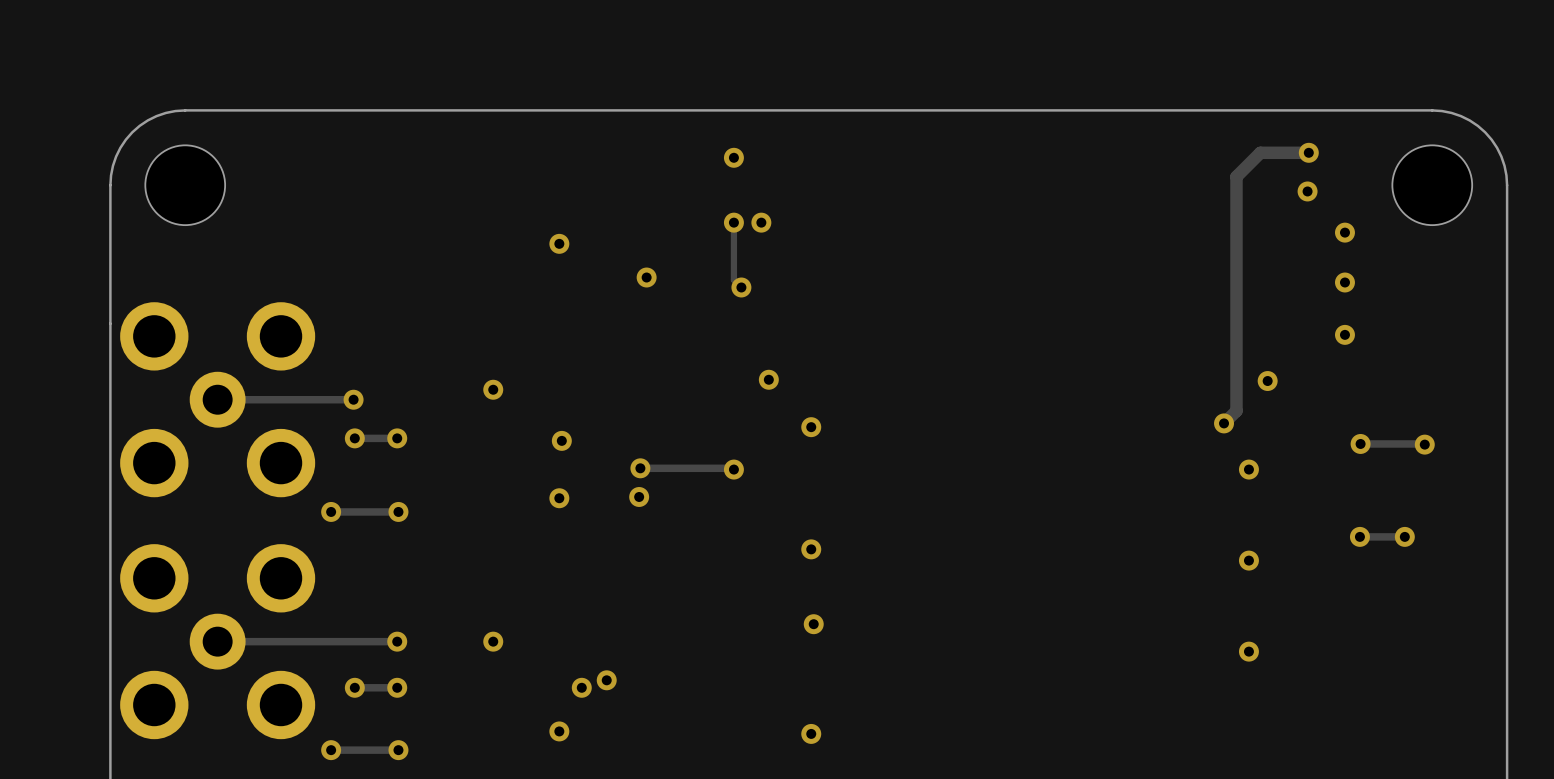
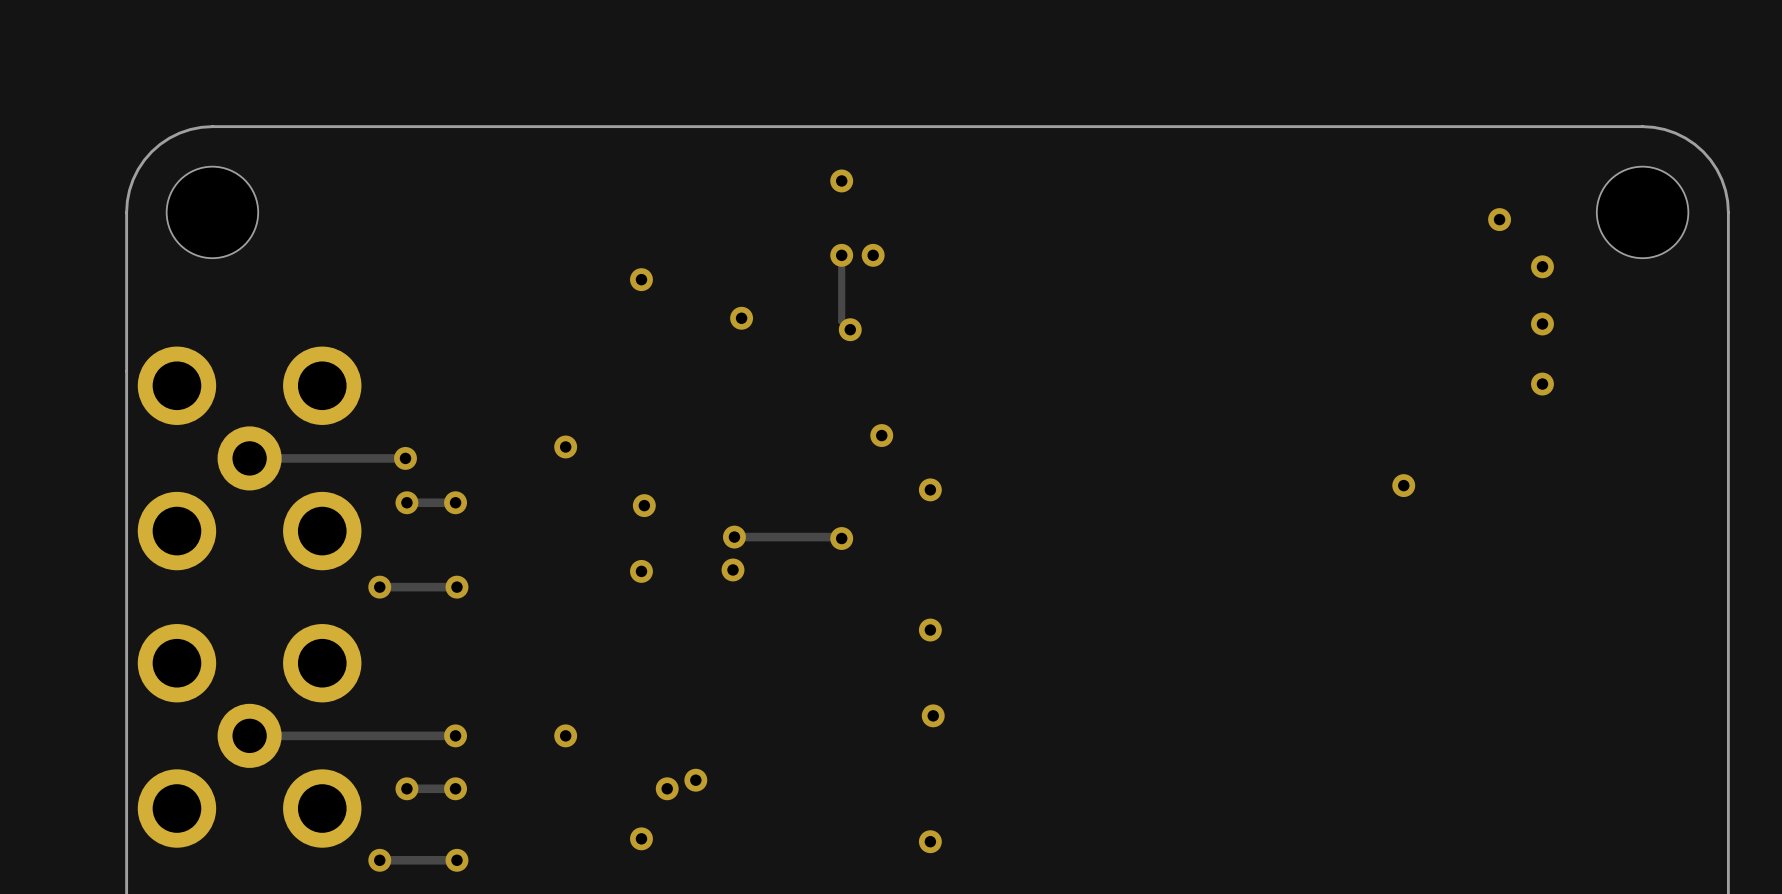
track: (1308, 152) (1260, 152) (1236, 176) (1236, 410) (1224, 423) -> none
via: (1308, 152) -> none
via: (1267, 381) -> none
track: (1360, 443) (1424, 444) -> none
via: (1360, 443) -> none
via: (1424, 444) -> none
via: (1248, 469) -> none
via: (1359, 536) -> none
track: (1404, 536) (1359, 536) -> none
via: (1404, 536) -> none
via: (1248, 560) -> none
via: (1248, 651) -> none

